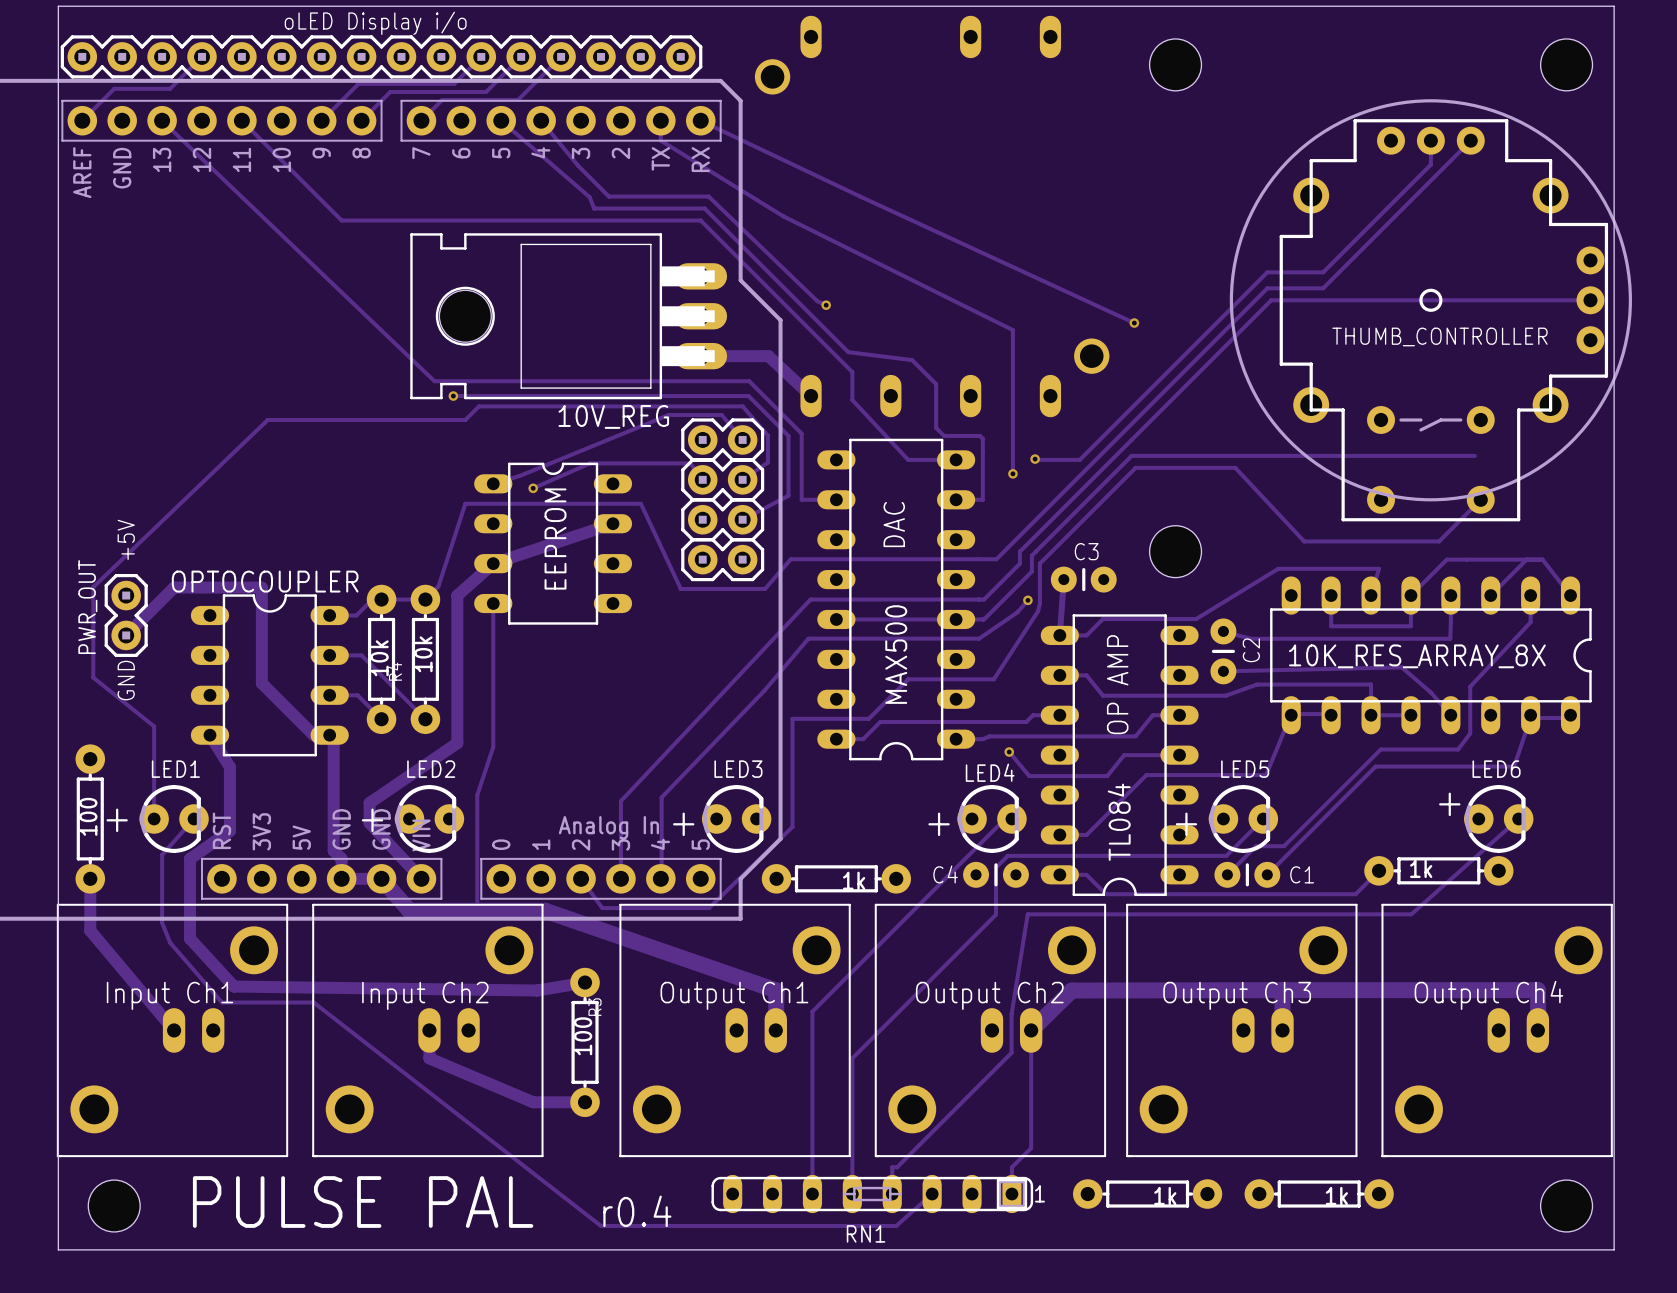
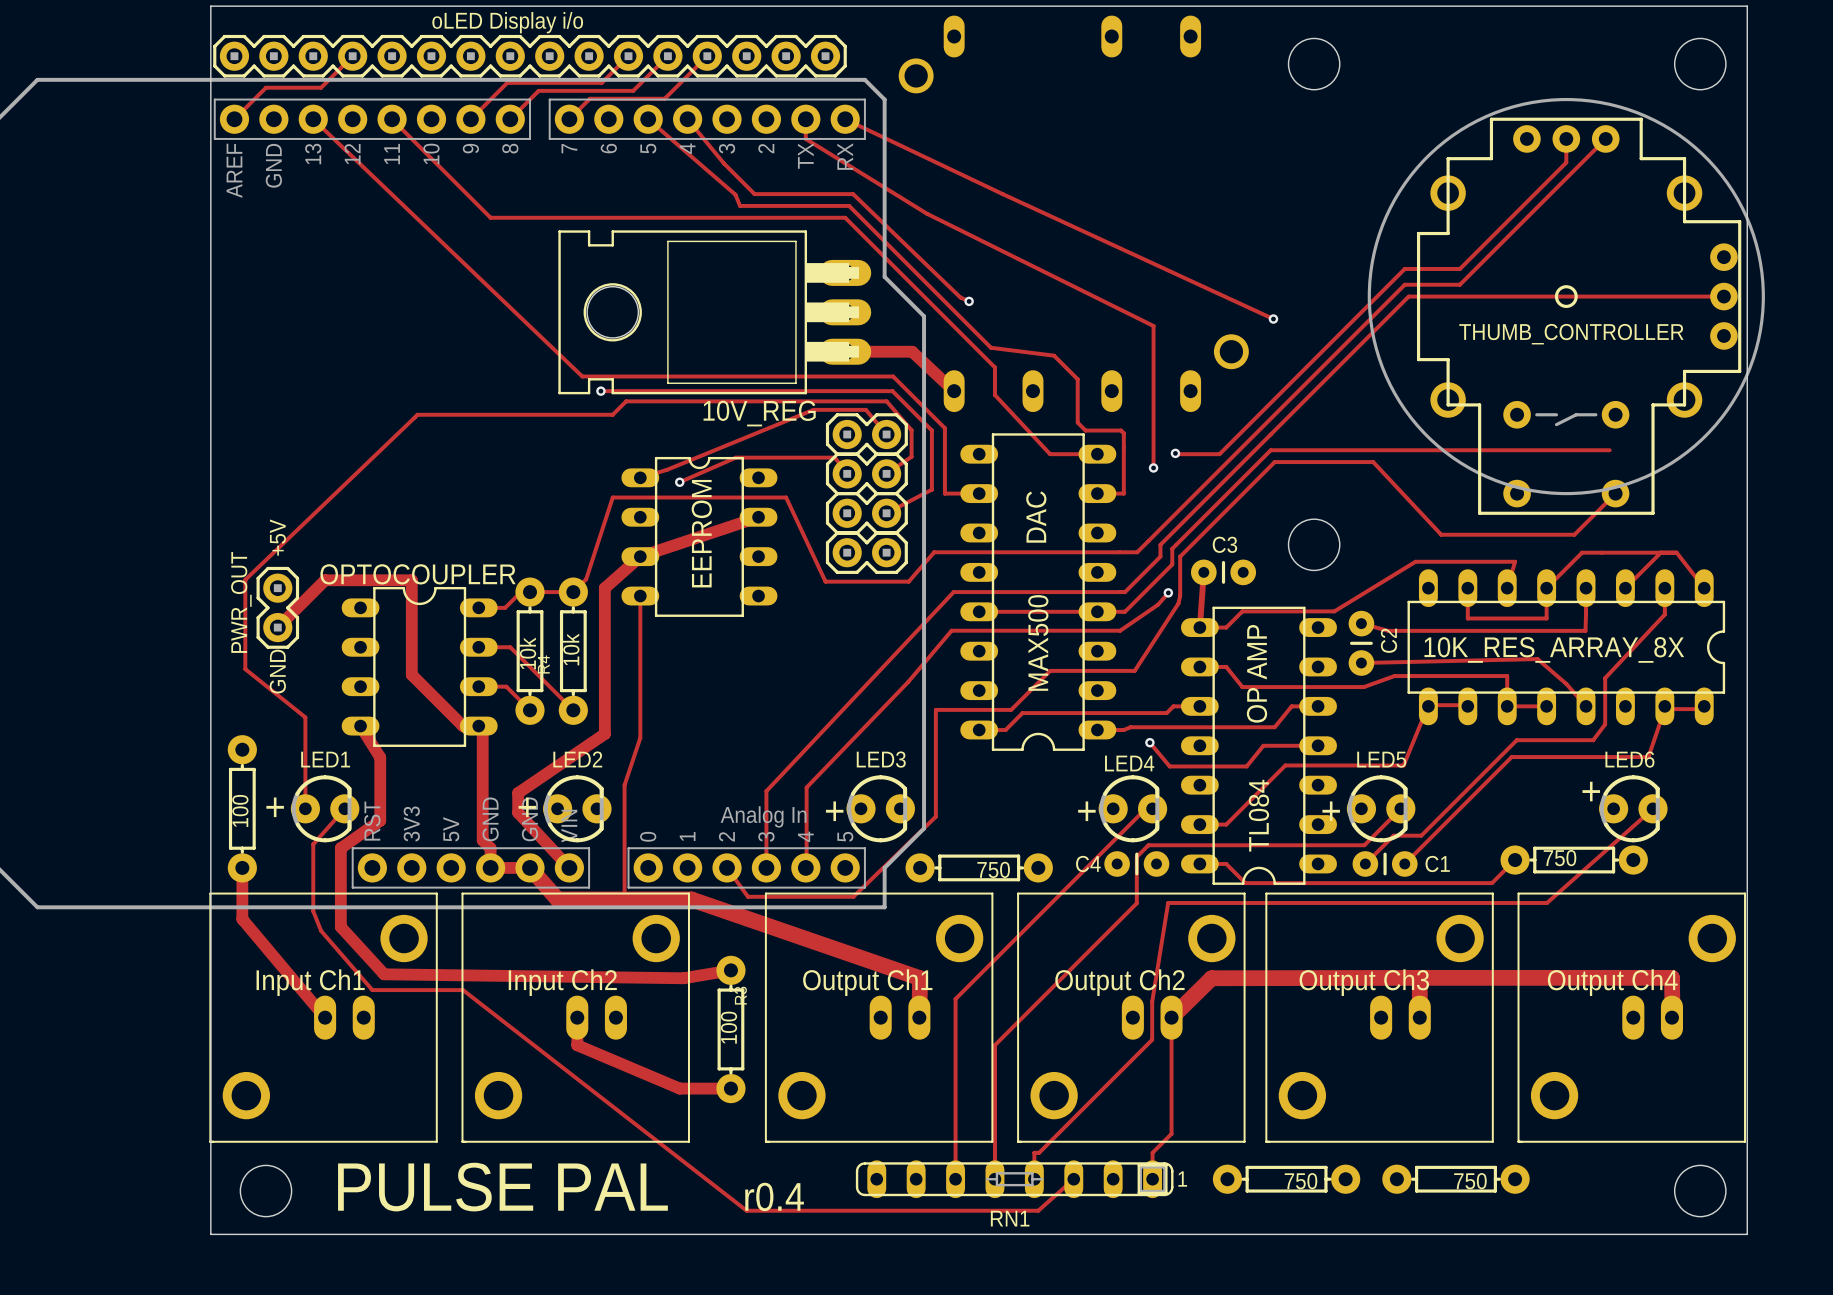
part value: 1k (1421, 868) -> 750 (1560, 858)
part value: 1k (854, 880) -> 750 (993, 869)
part value: 1k (1165, 1196) -> 750 (1301, 1181)
part value: 1k (1336, 1196) -> 750 (1470, 1181)

